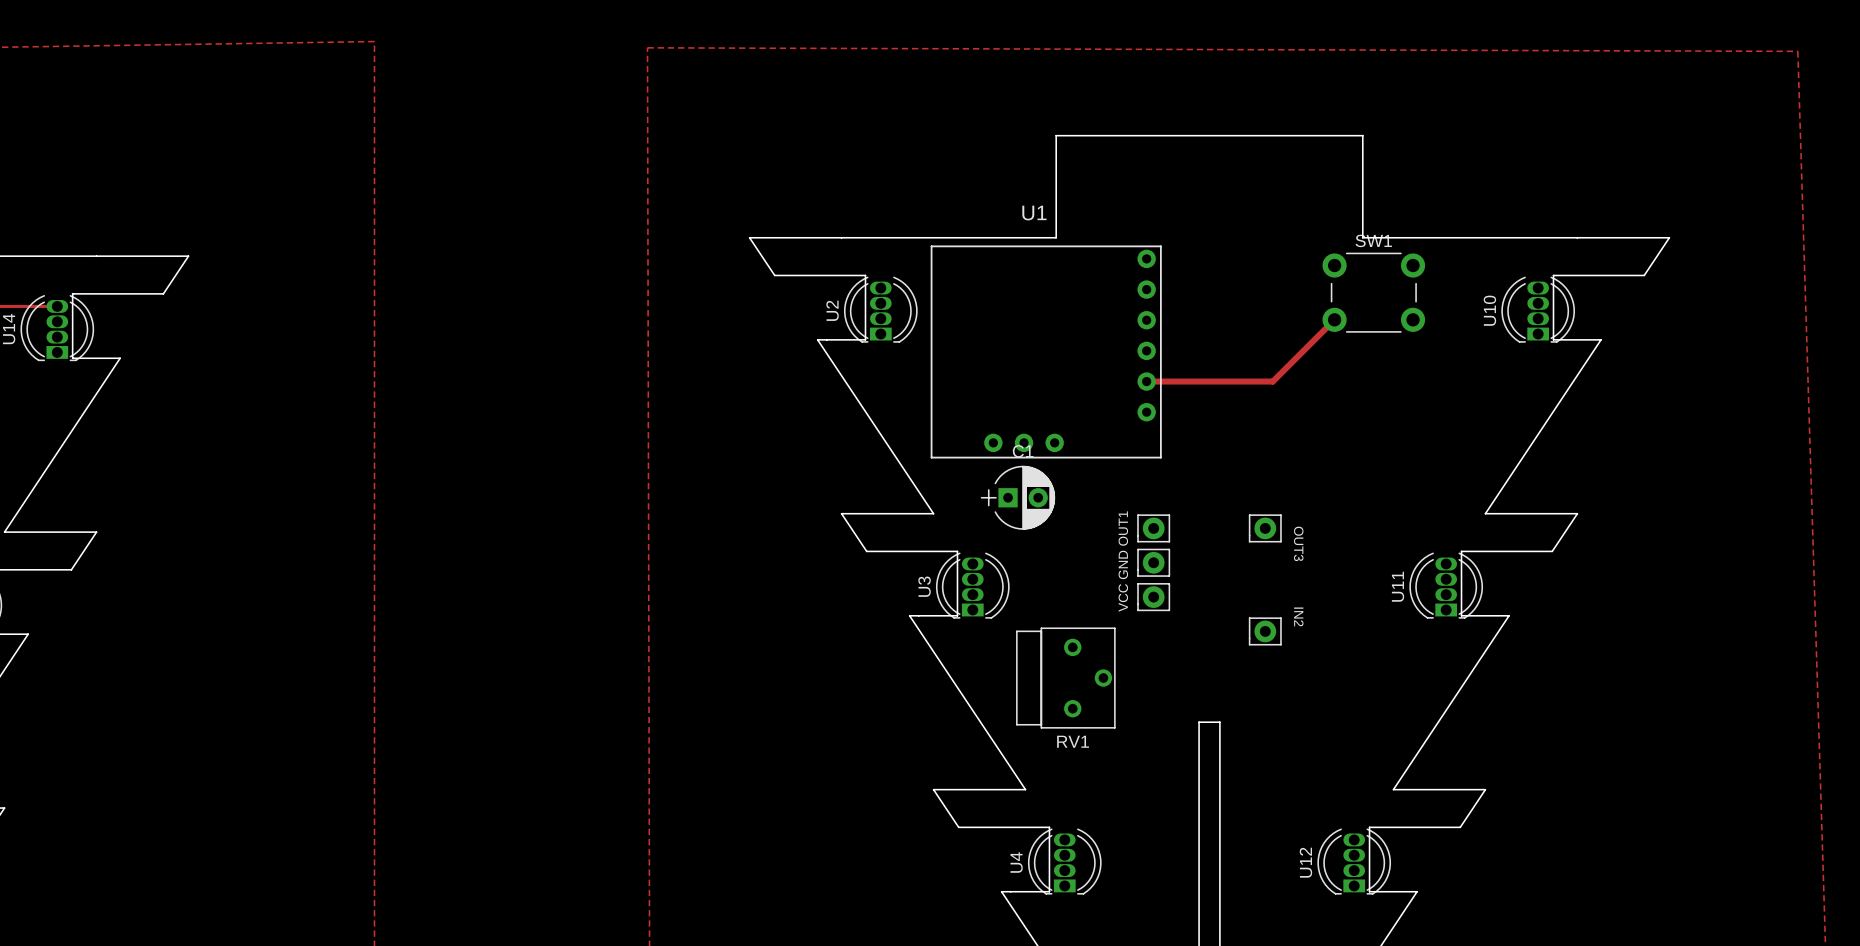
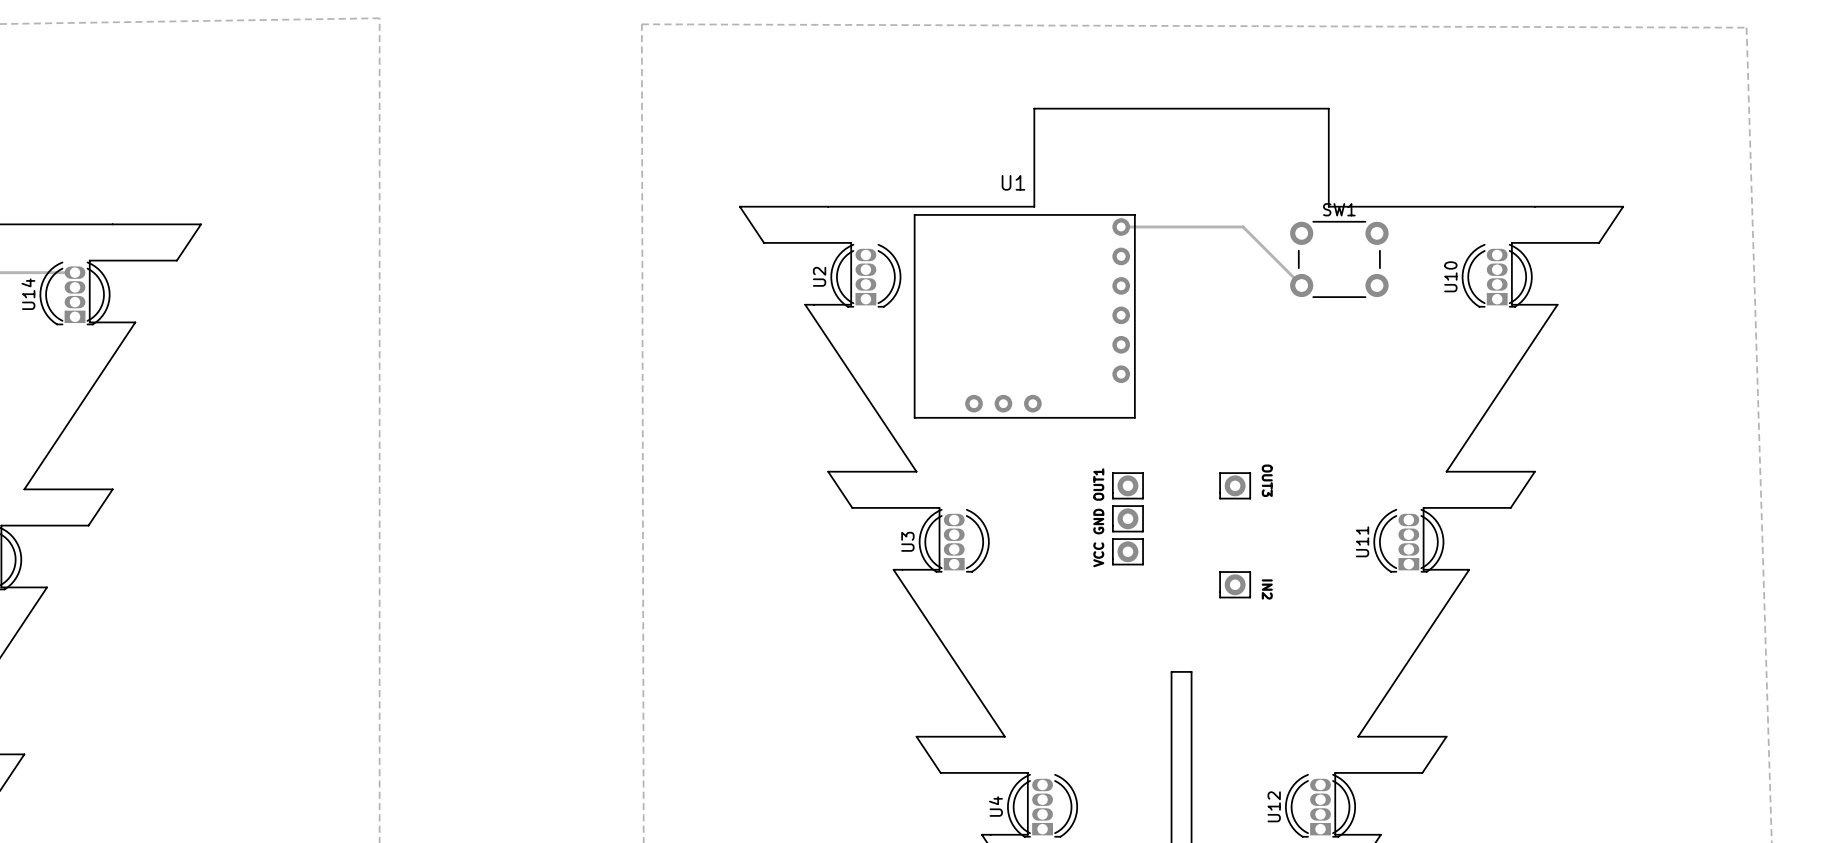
track: (1334, 319) (1272, 381) (1146, 381) -> (1301, 285) (1243, 227) (1121, 227)
C1: (1017, 497) -> none
RV1: (1065, 678) -> none

